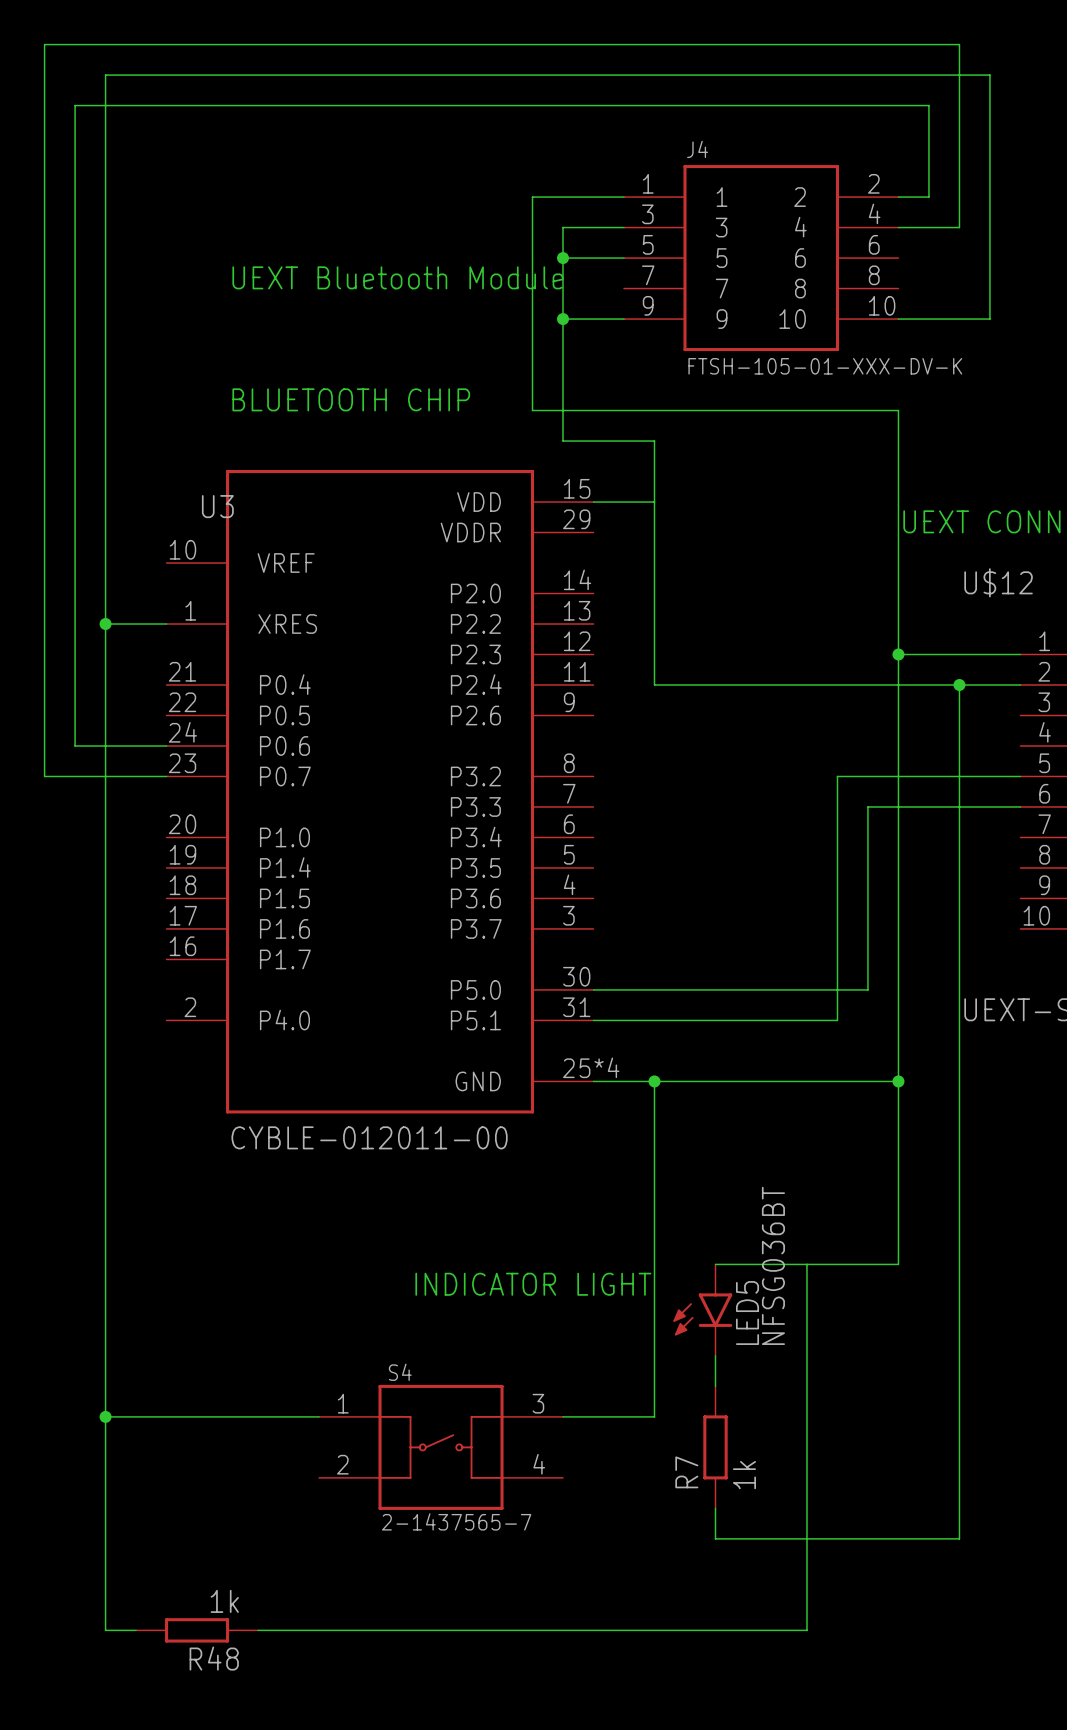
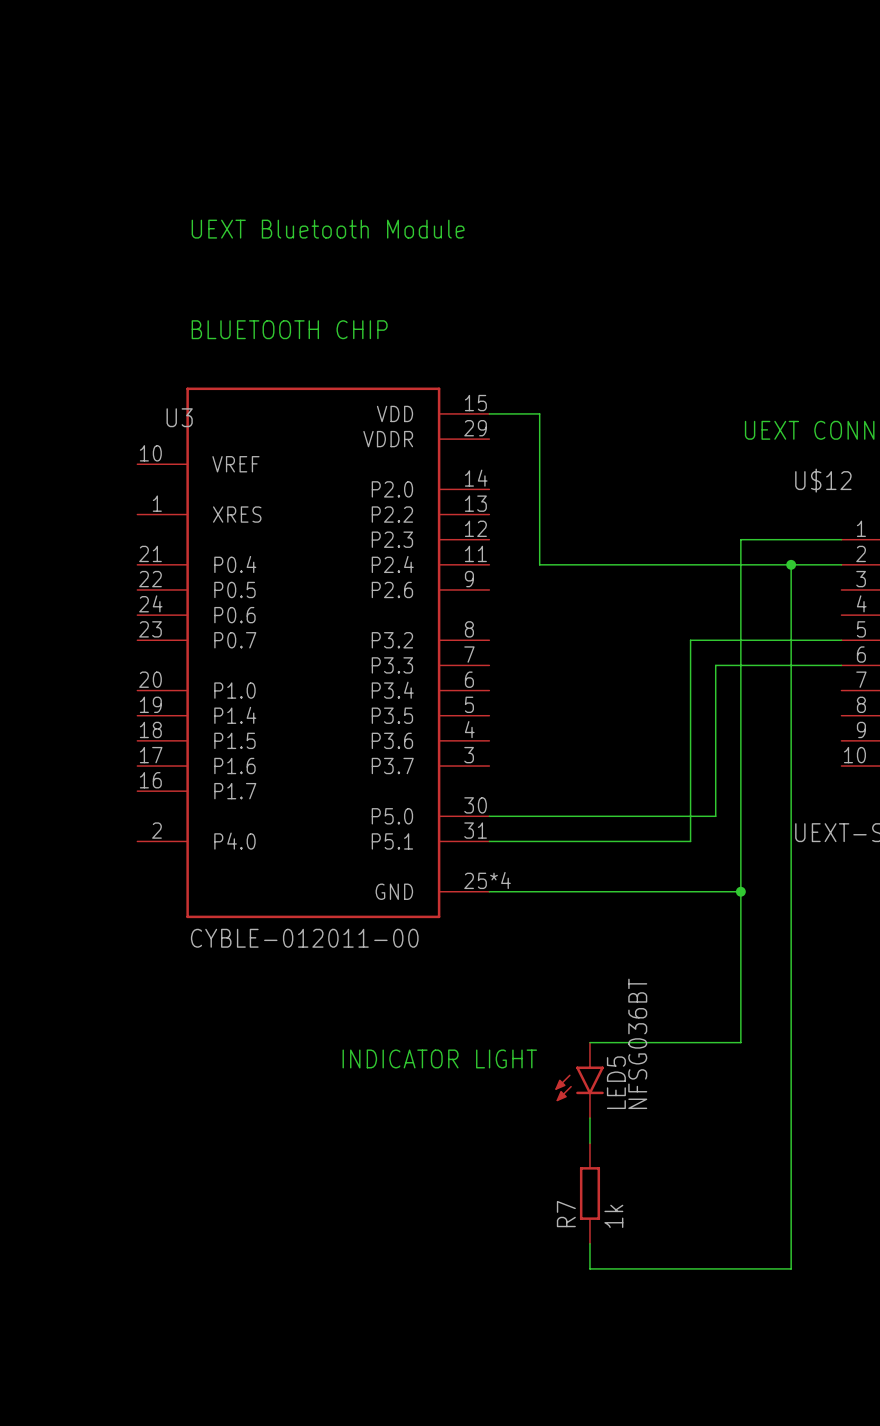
wire: (624, 197) (532, 197) (532, 410) (898, 410) (898, 654) -> none
wire: (898, 197) (928, 197) (928, 105) (75, 105) (75, 745) (166, 745) -> none
wire: (624, 227) (563, 227) (563, 441) (654, 441) (654, 502) -> none
wire: (898, 227) (959, 227) (959, 44) (44, 44) (44, 776) (166, 776) -> none
wire: (563, 258) (624, 258) -> none
junction: (563, 258) -> none
J4: FTSH-105-01-XXX-DV-K (761, 258) -> none
wire: (563, 319) (624, 319) -> none
junction: (563, 319) -> none
wire: (898, 319) (989, 319) (989, 75) (105, 75) (105, 1630) (136, 1630) -> none
wire: (105, 624) (166, 624) -> none
junction: (105, 624) -> none
junction: (898, 654) -> none
wire: (654, 1081) (654, 1416) (563, 1416) -> none
junction: (654, 1081) -> none
wire: (806, 1264) (806, 1630) (258, 1630) -> none
wire: (105, 1416) (319, 1416) -> none
junction: (105, 1416) -> none
S4: 2-1437565-7 (441, 1447) -> none
R48: 1k (197, 1630) -> none

